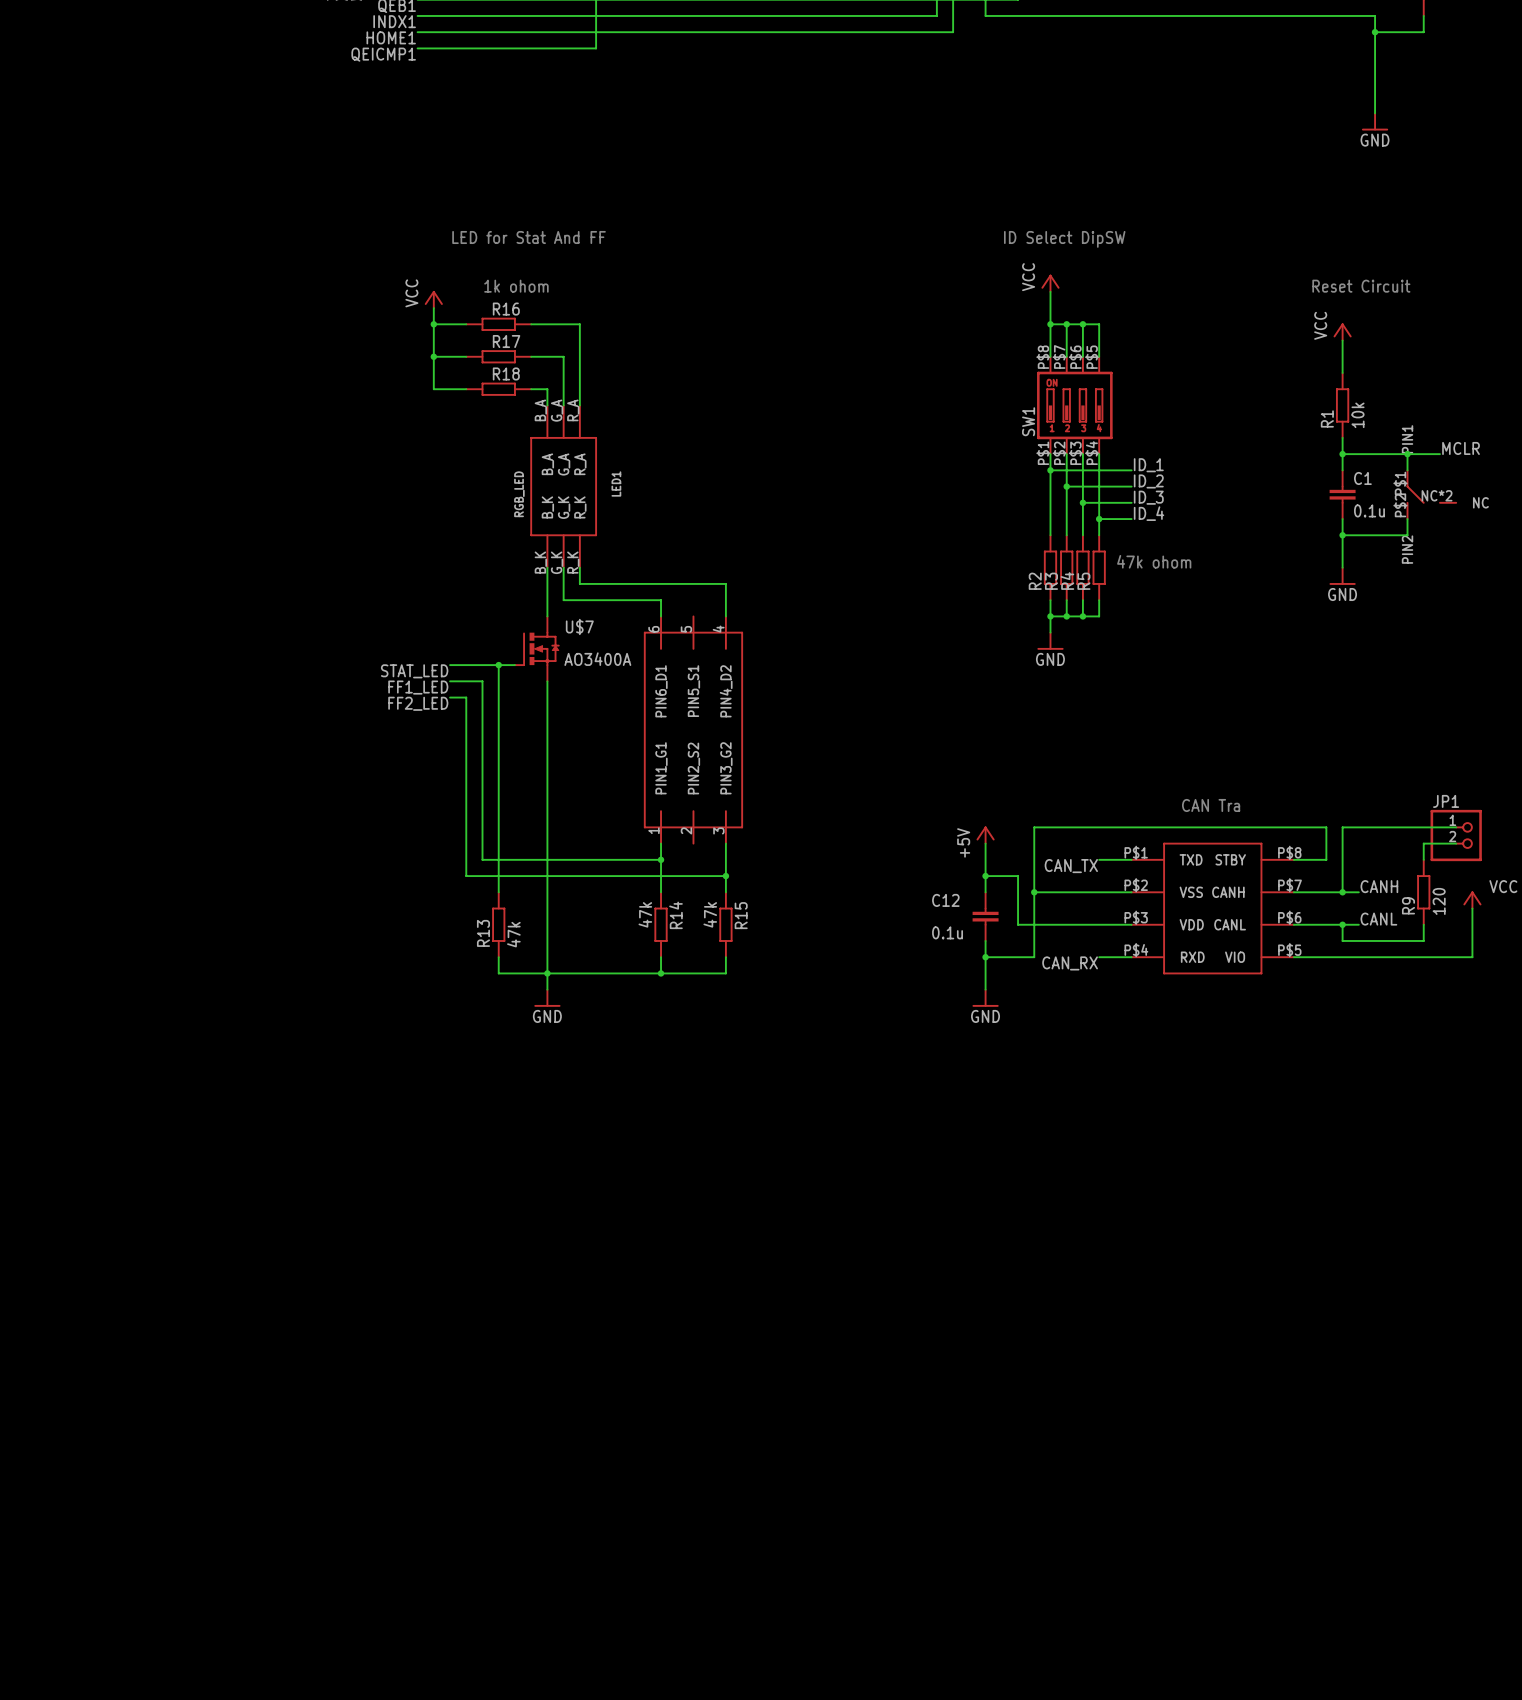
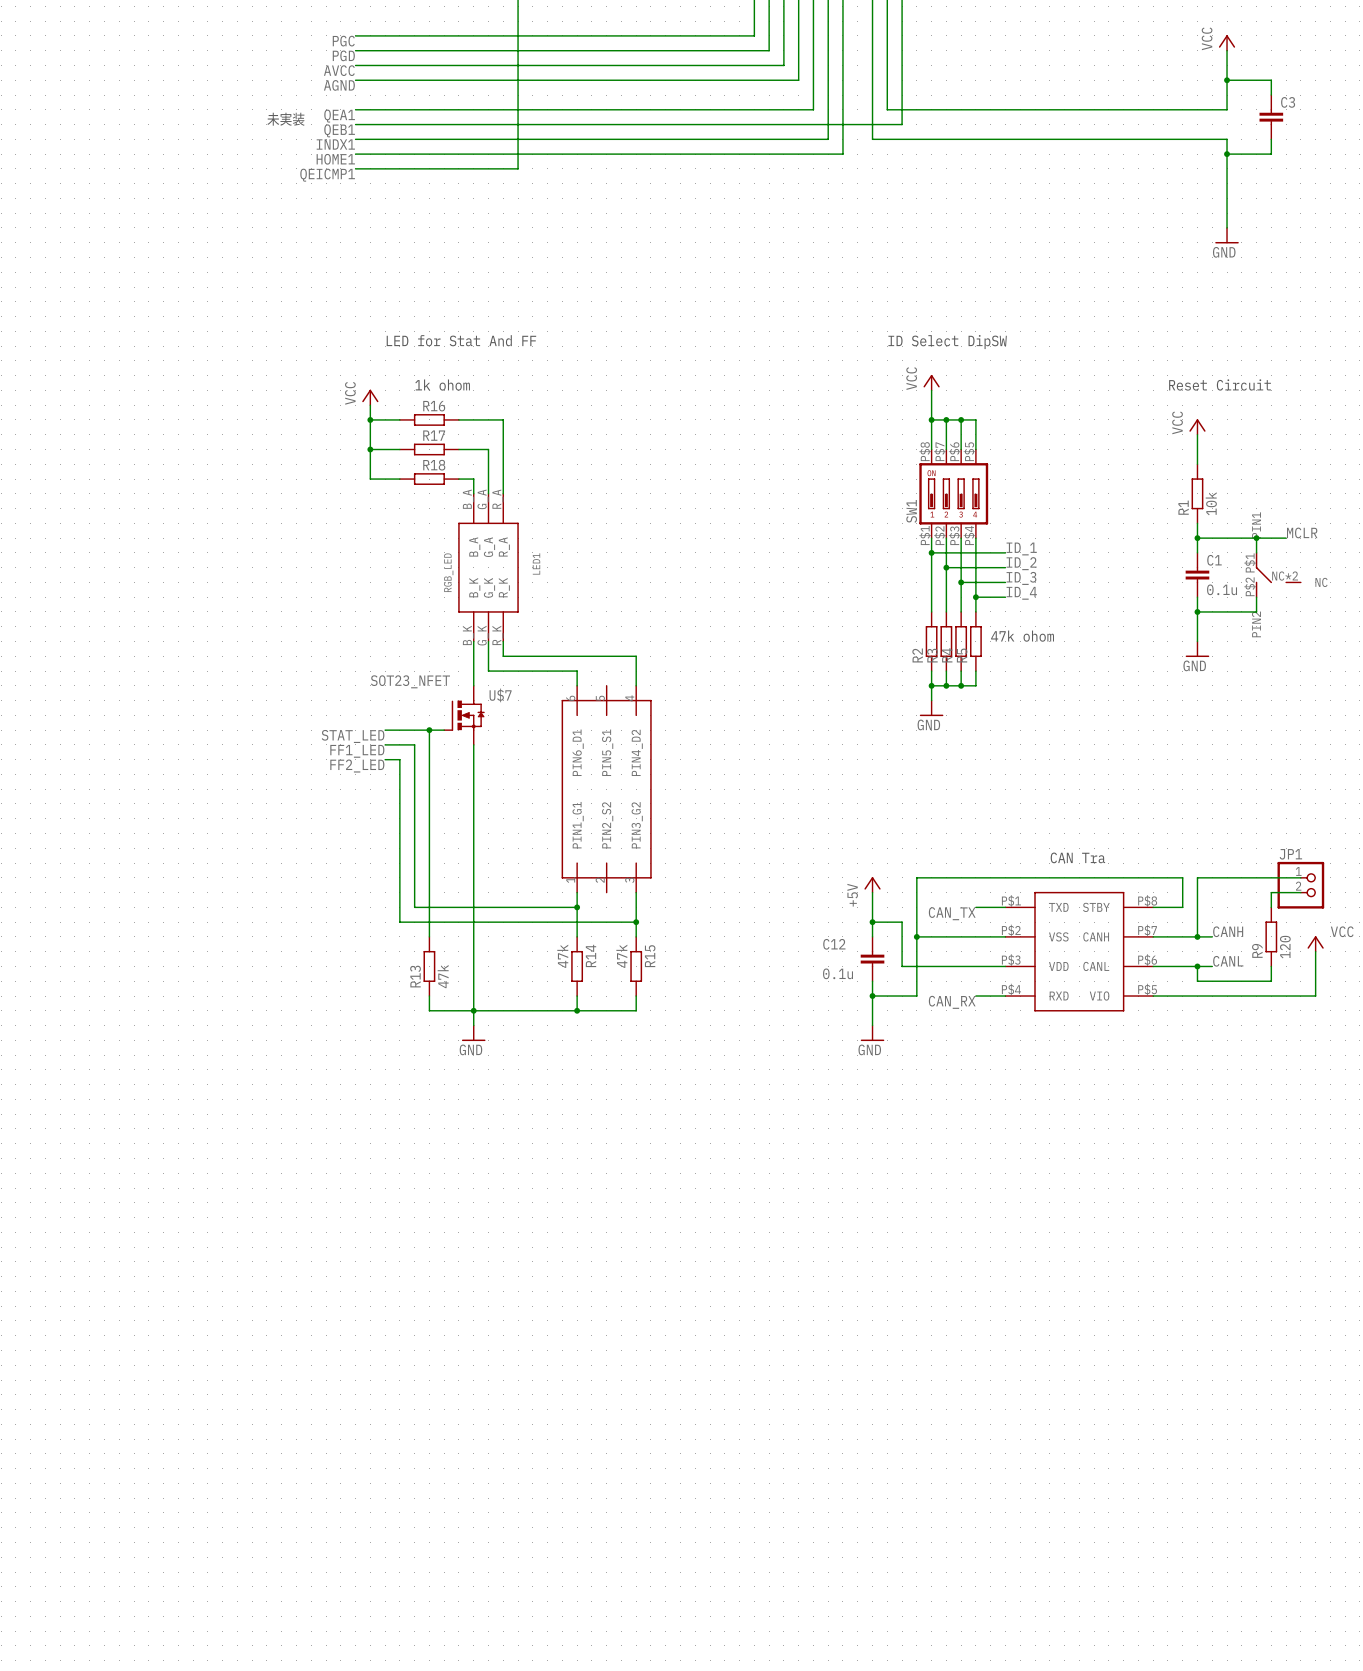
U$7 value: AO3400A (597, 659) -> SOT23_NFET (410, 681)

